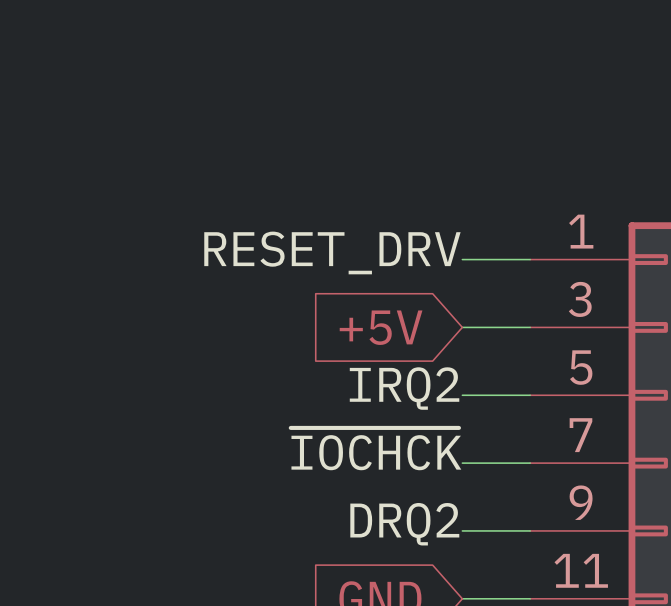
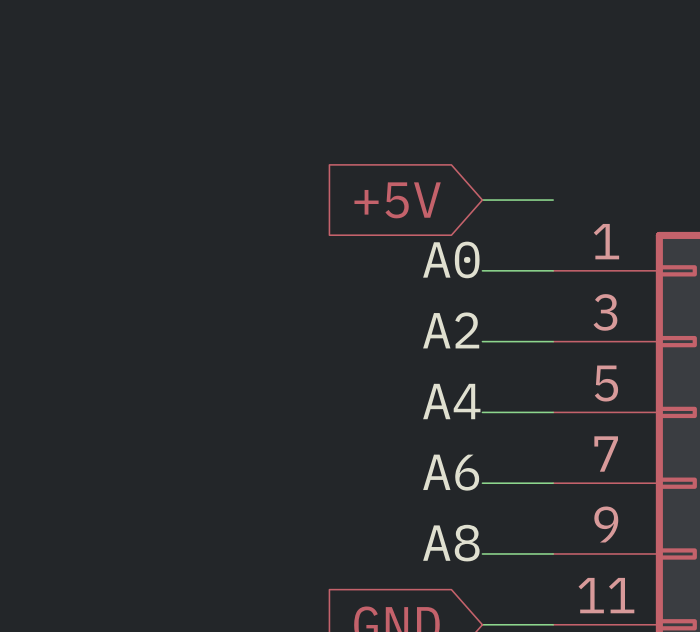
wire: none -> (482, 200) (553, 200)
label: RESET_DRV (332, 252) -> A0 (451, 259)
label: none -> A2 (451, 330)
global label position: +5V (381, 327) -> +5V (397, 200)
label: IRQ2 (404, 388) -> A4 (451, 401)
label: ~{IOCHCK} (376, 449) -> A6 (451, 472)
label: DRQ2 (404, 524) -> A8 (451, 543)

